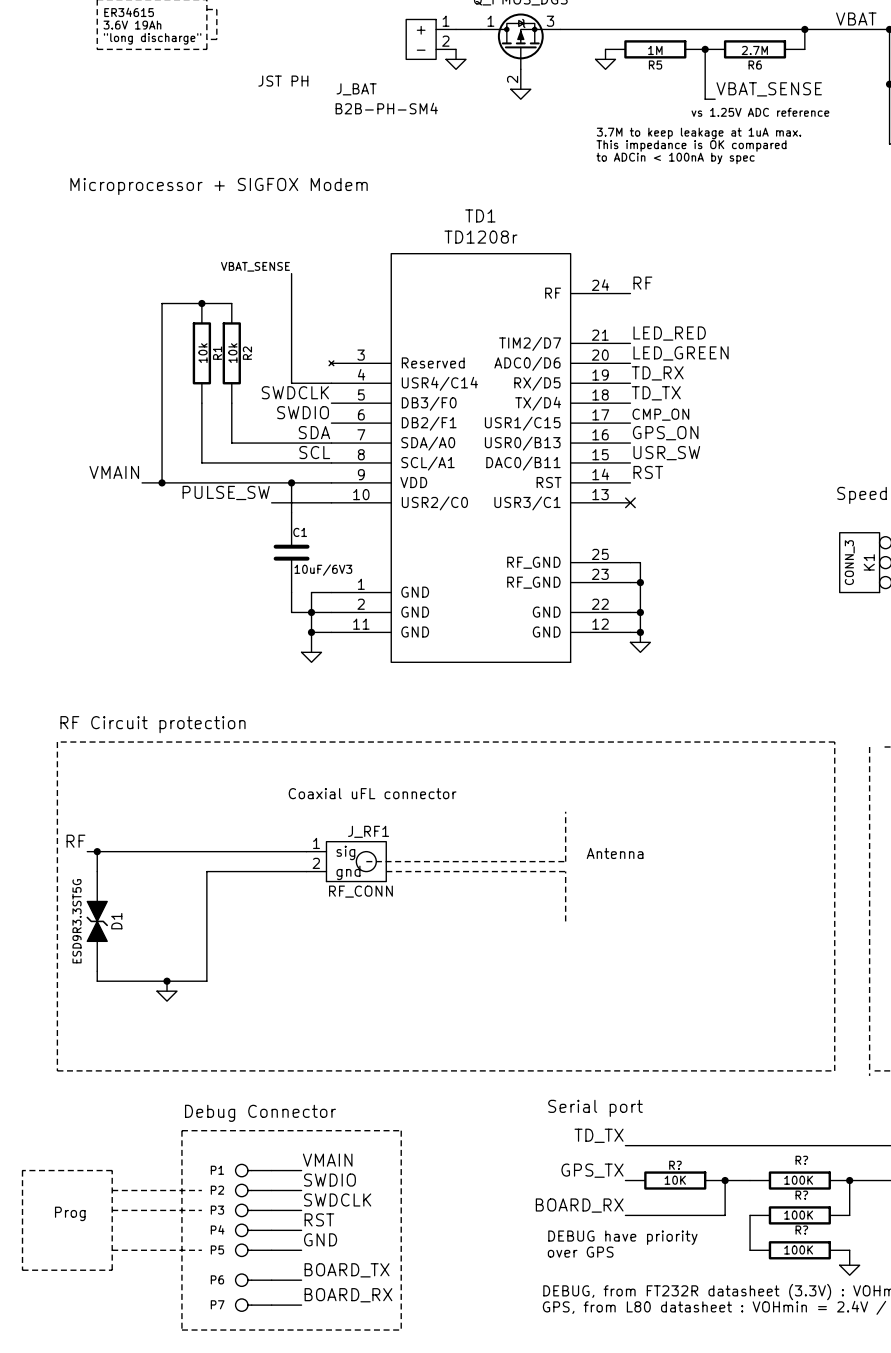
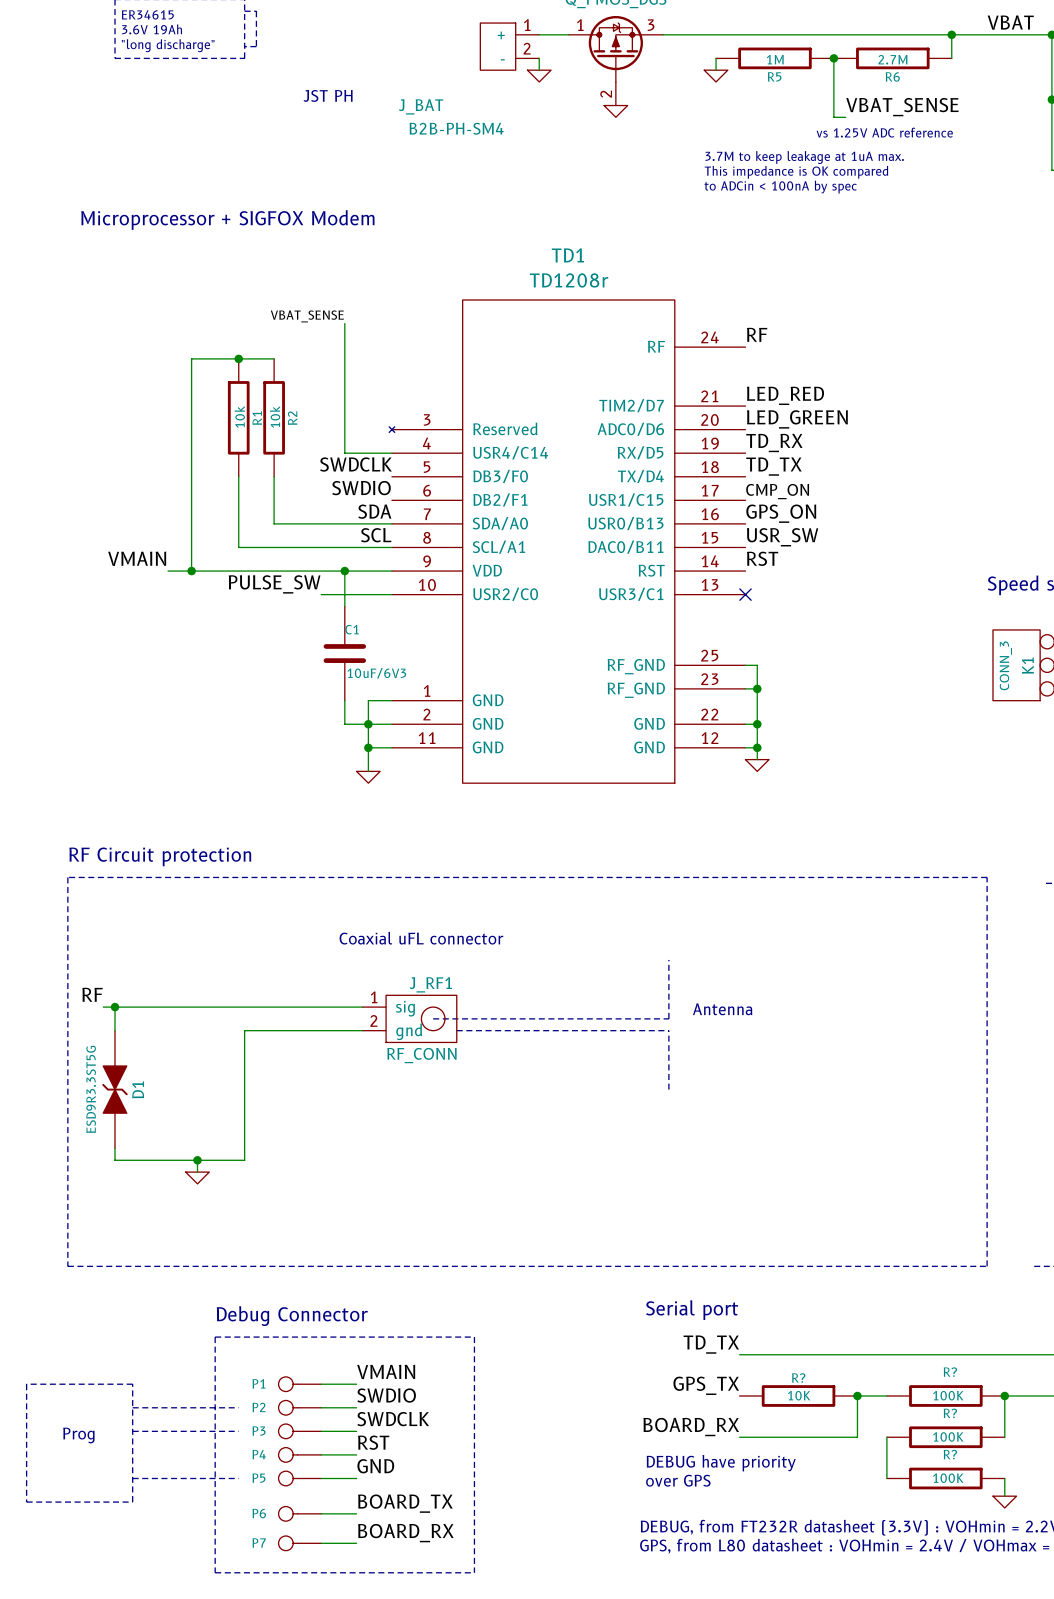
line: (869, 747) (869, 1075) -> none

